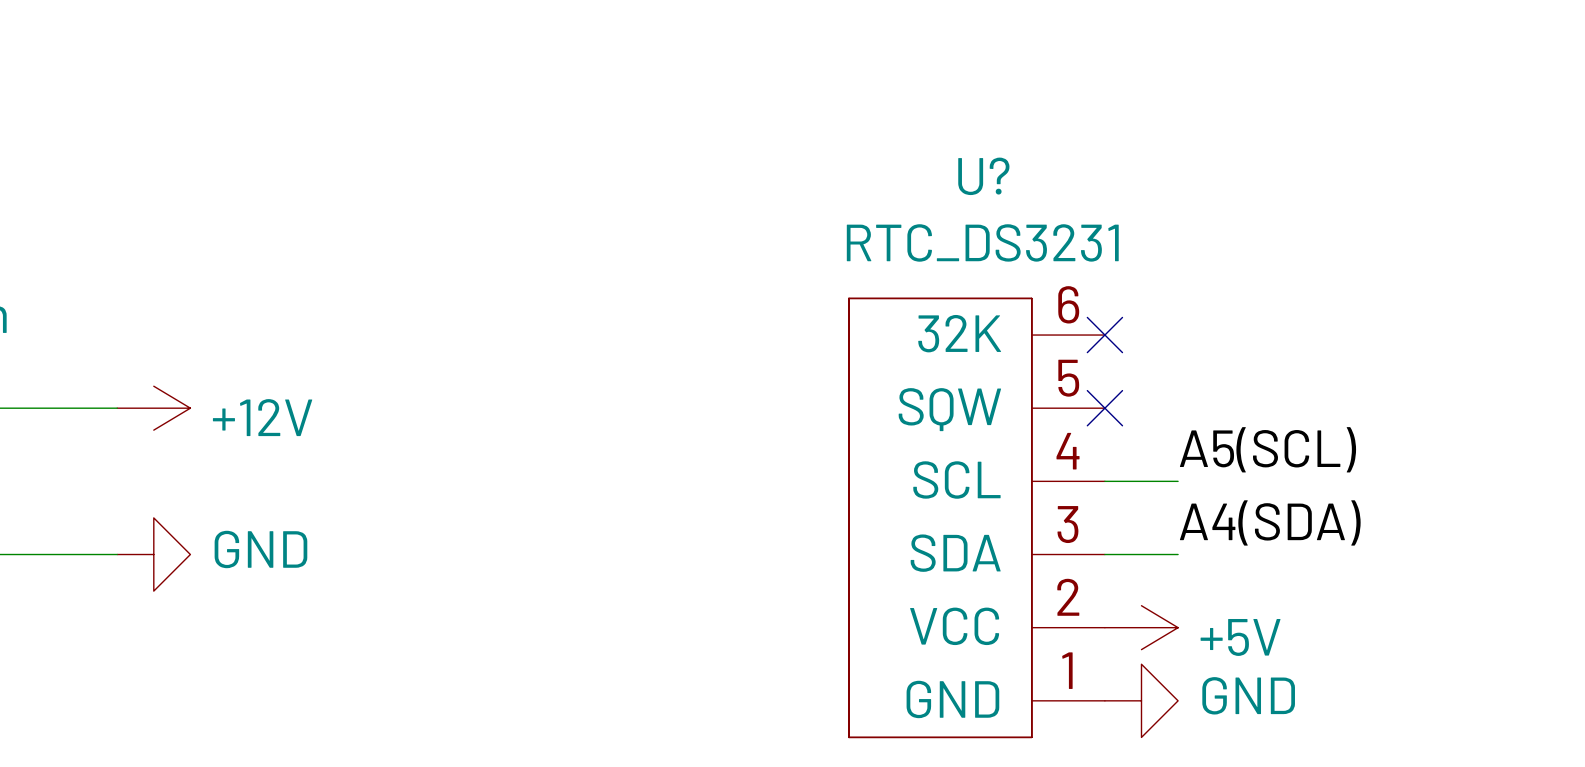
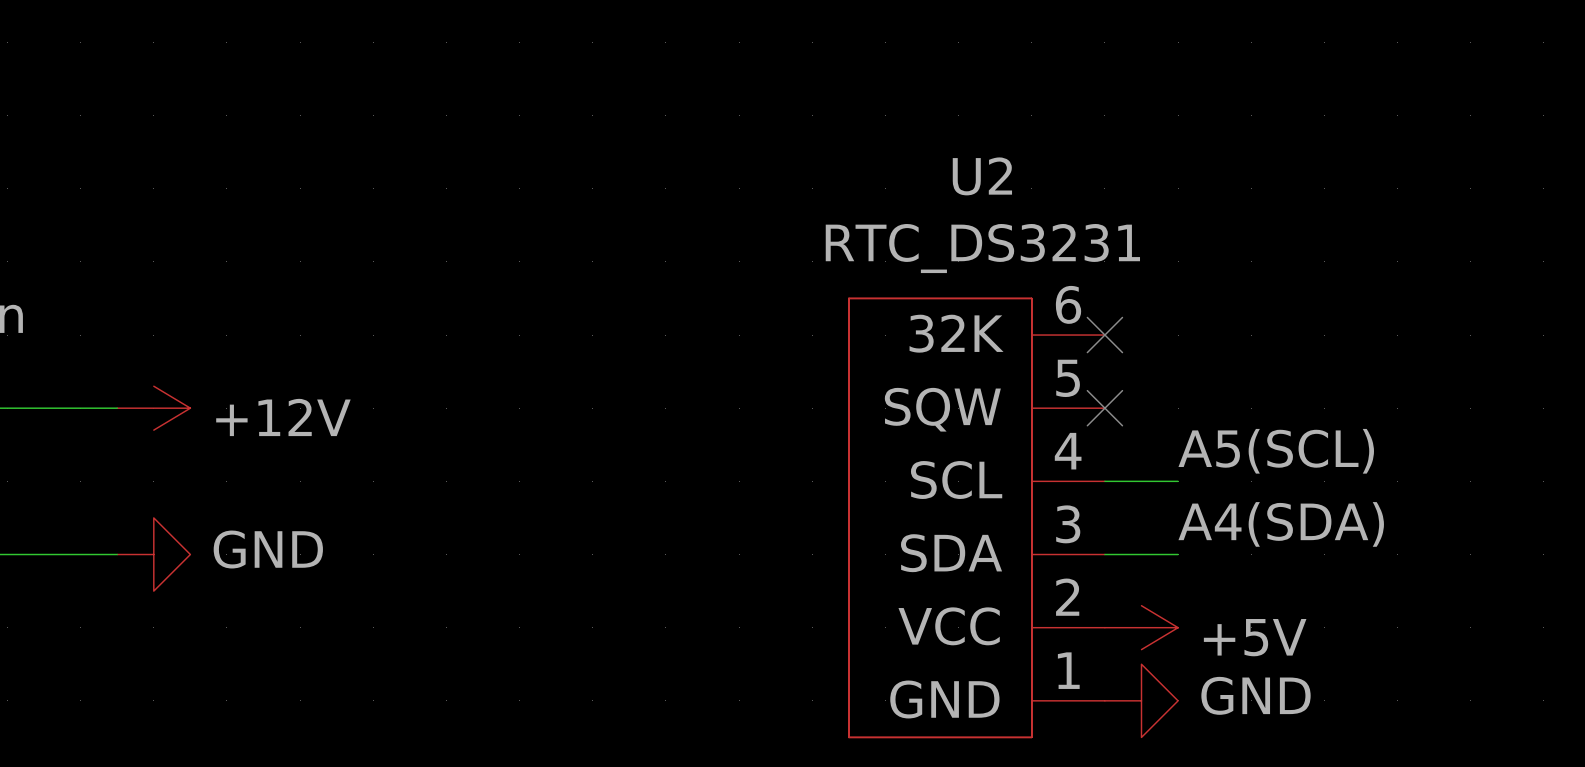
U? name: U? (983, 176) -> U2 (982, 176)

